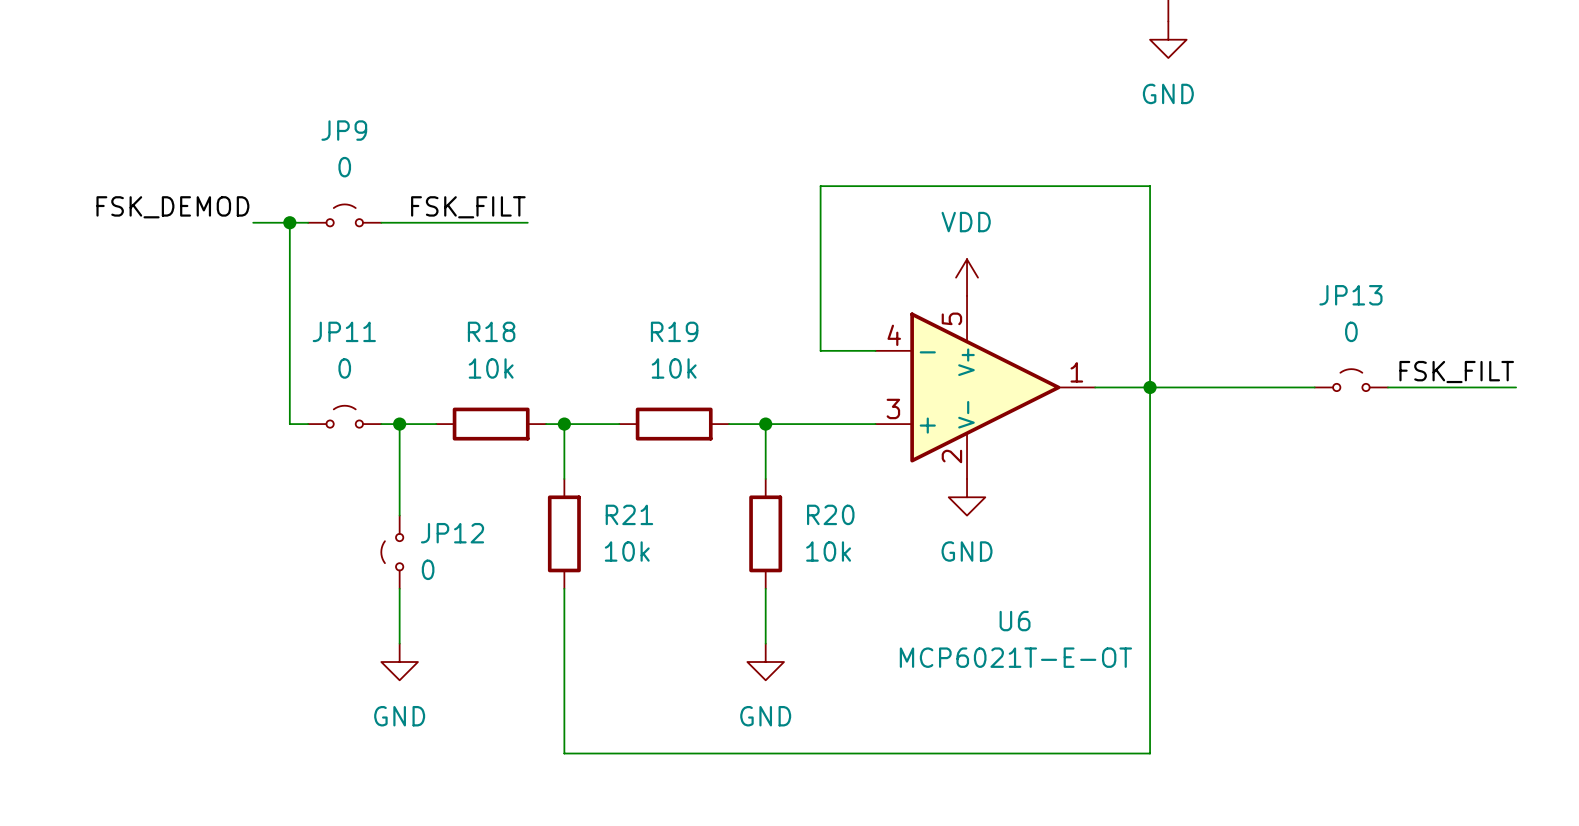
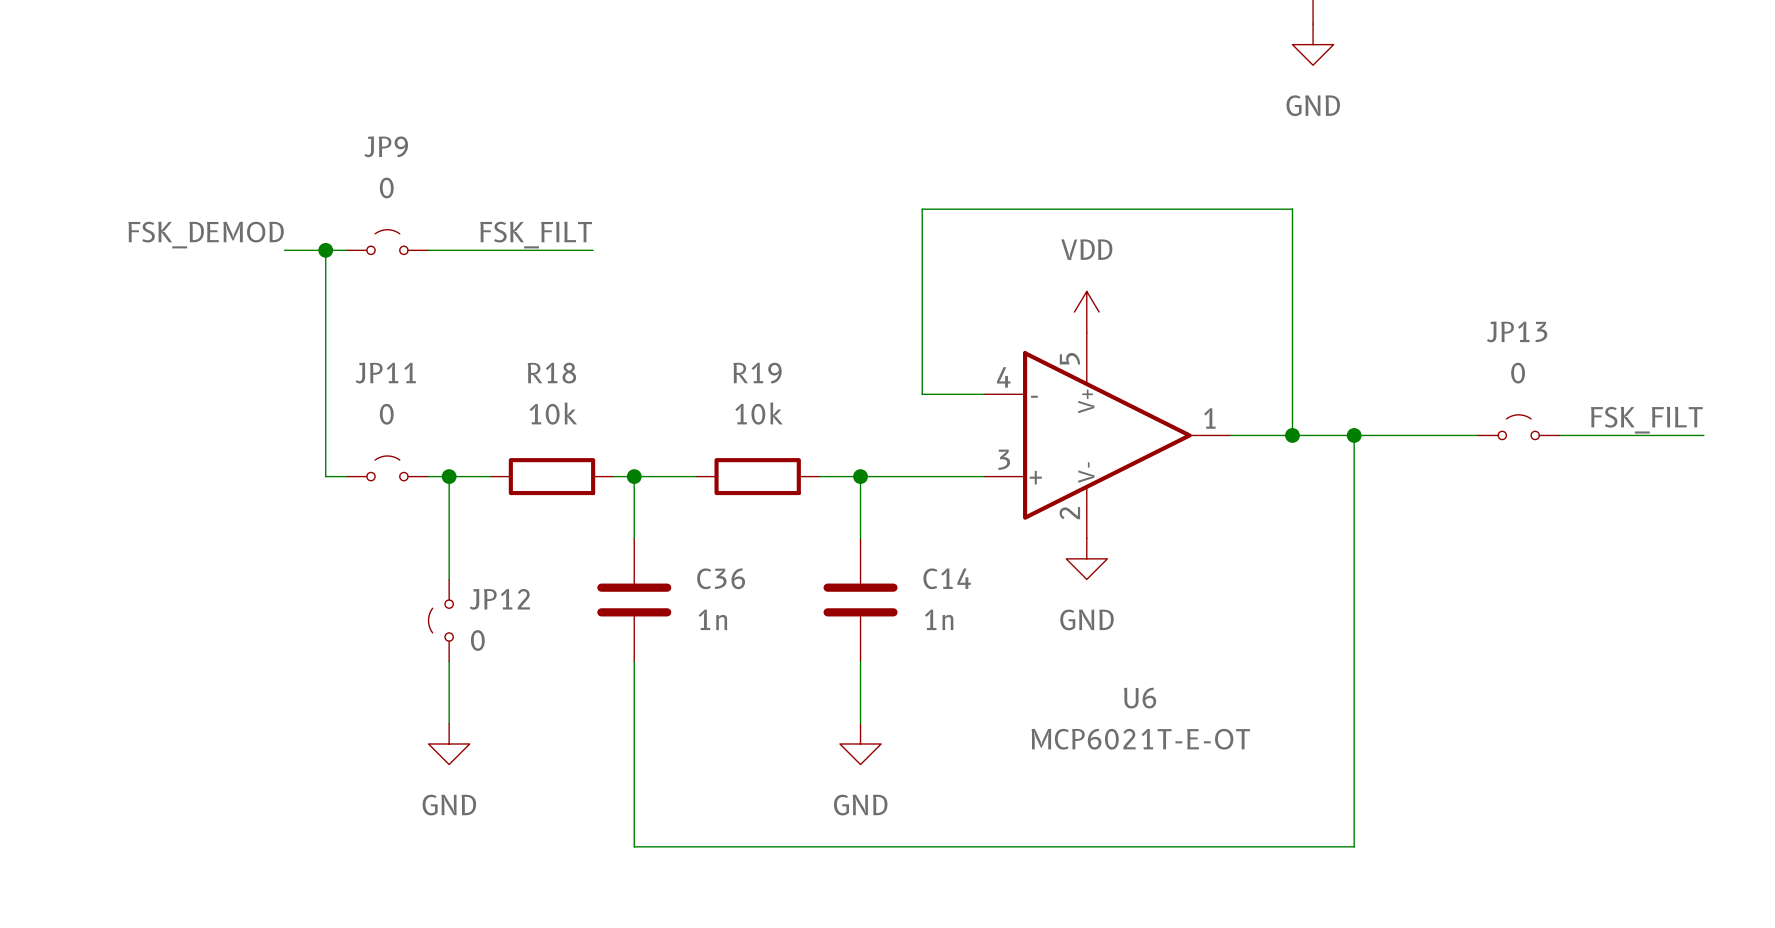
wire: (1150, 387) (1150, 753) -> (1354, 435) (1354, 846) (1292, 846)
junction: none -> (1354, 435)
R21: 10k (564, 533) -> none
C36: none -> 1n (634, 600)
R20: 10k (765, 533) -> none
C14: none -> 1n (860, 600)

